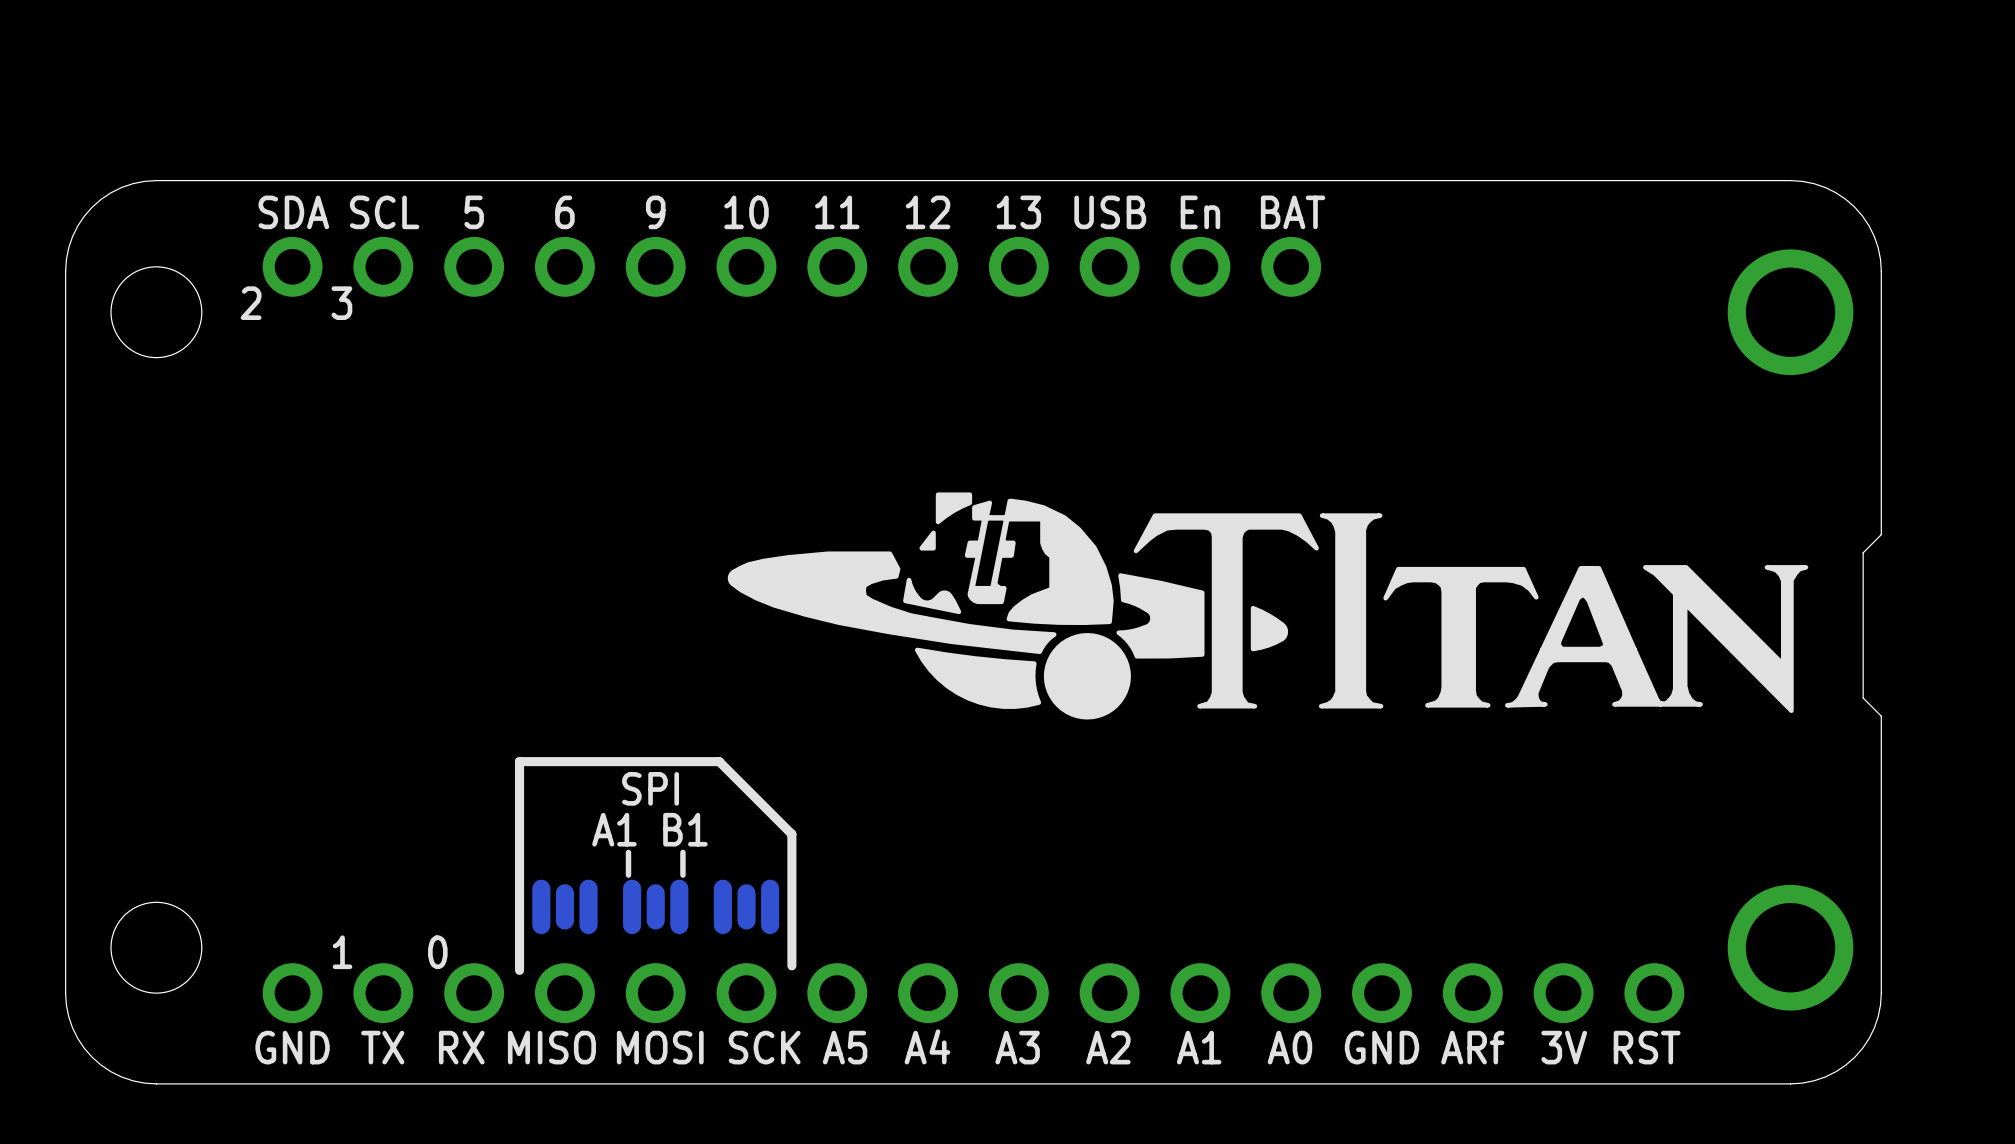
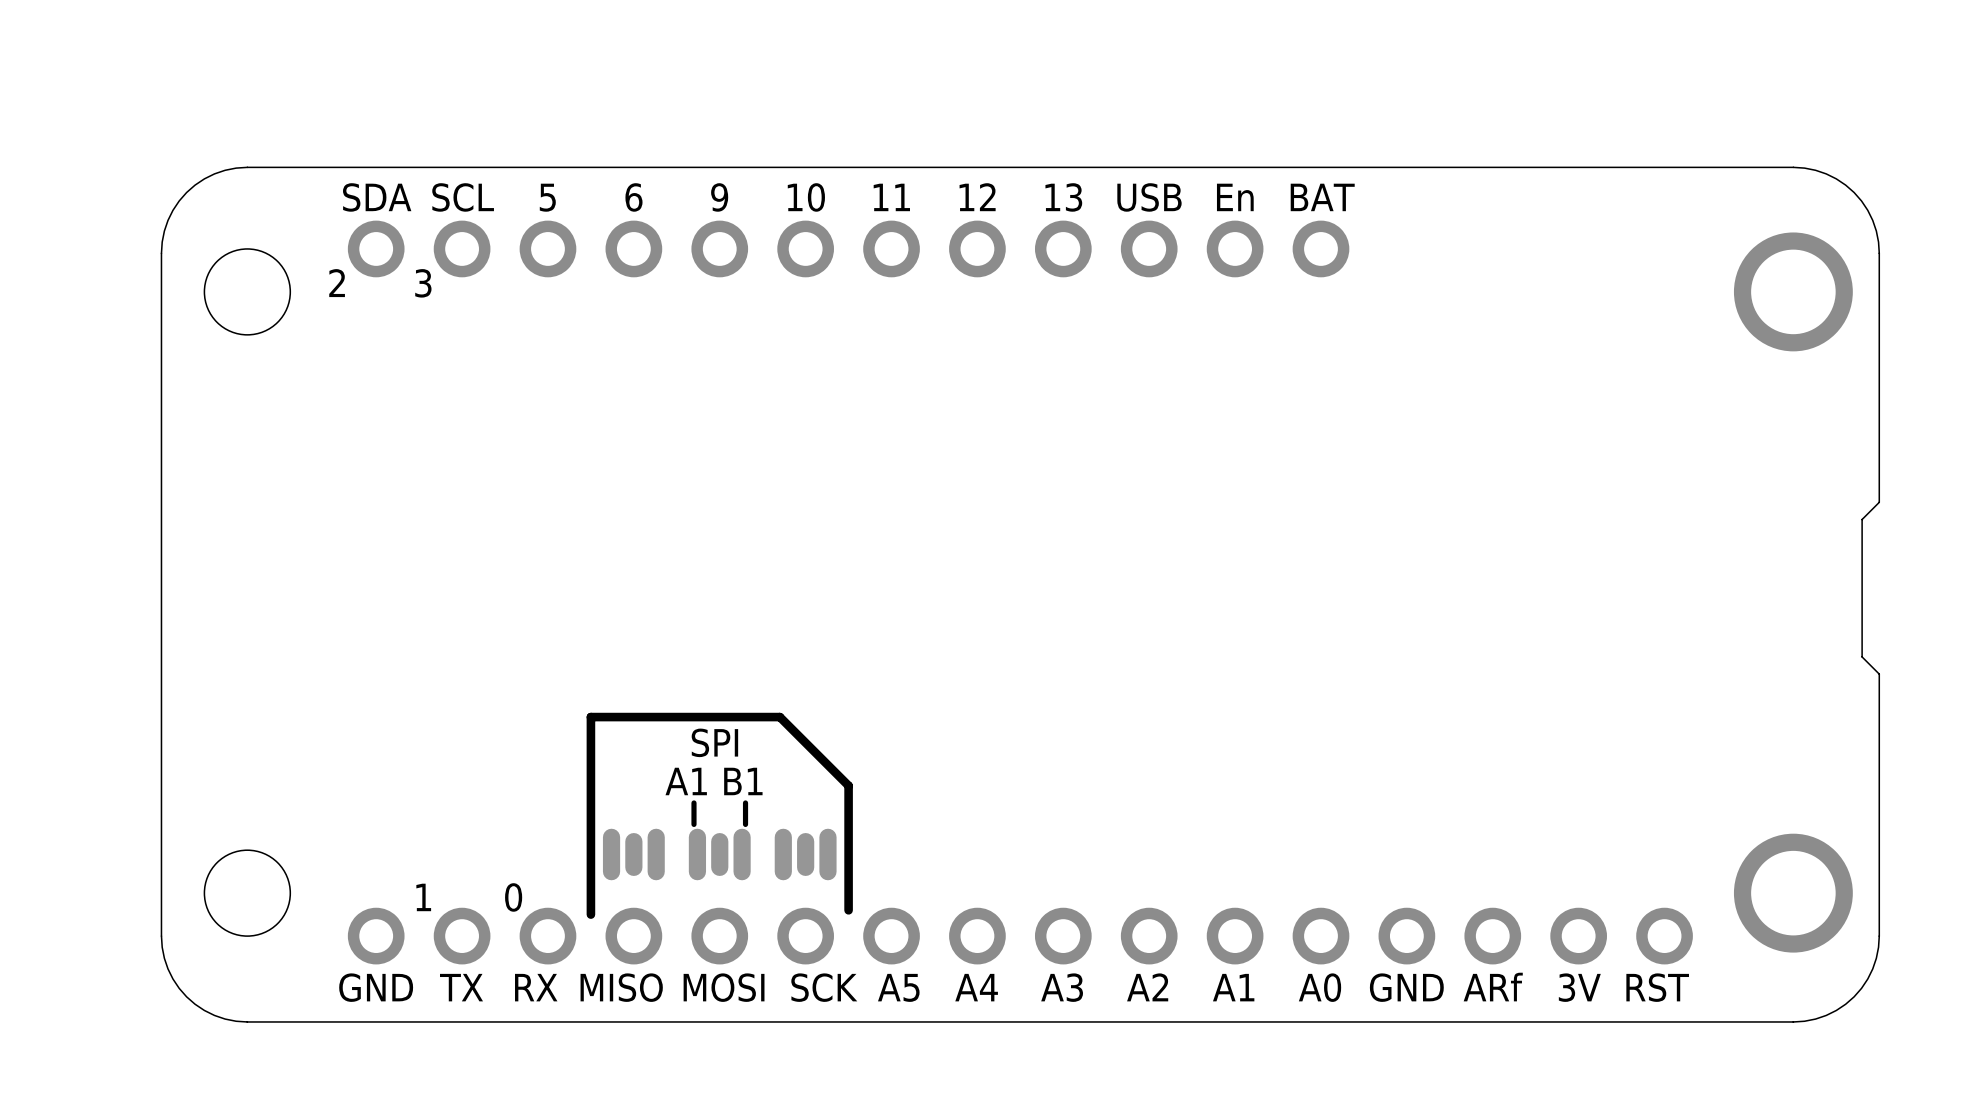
drawing: [727, 492, 1809, 720] -> none

